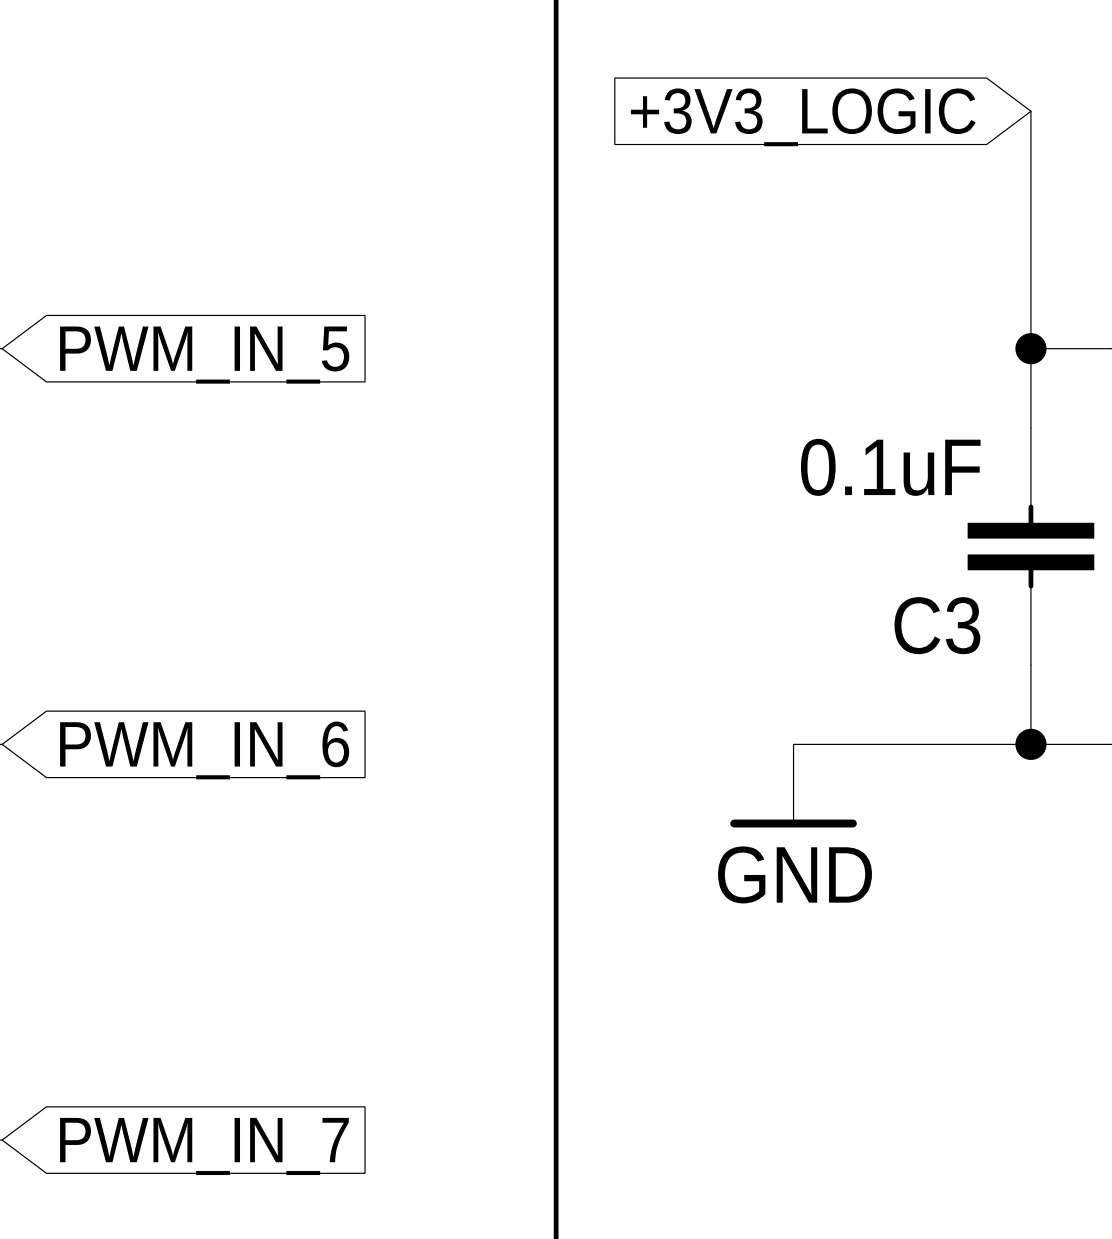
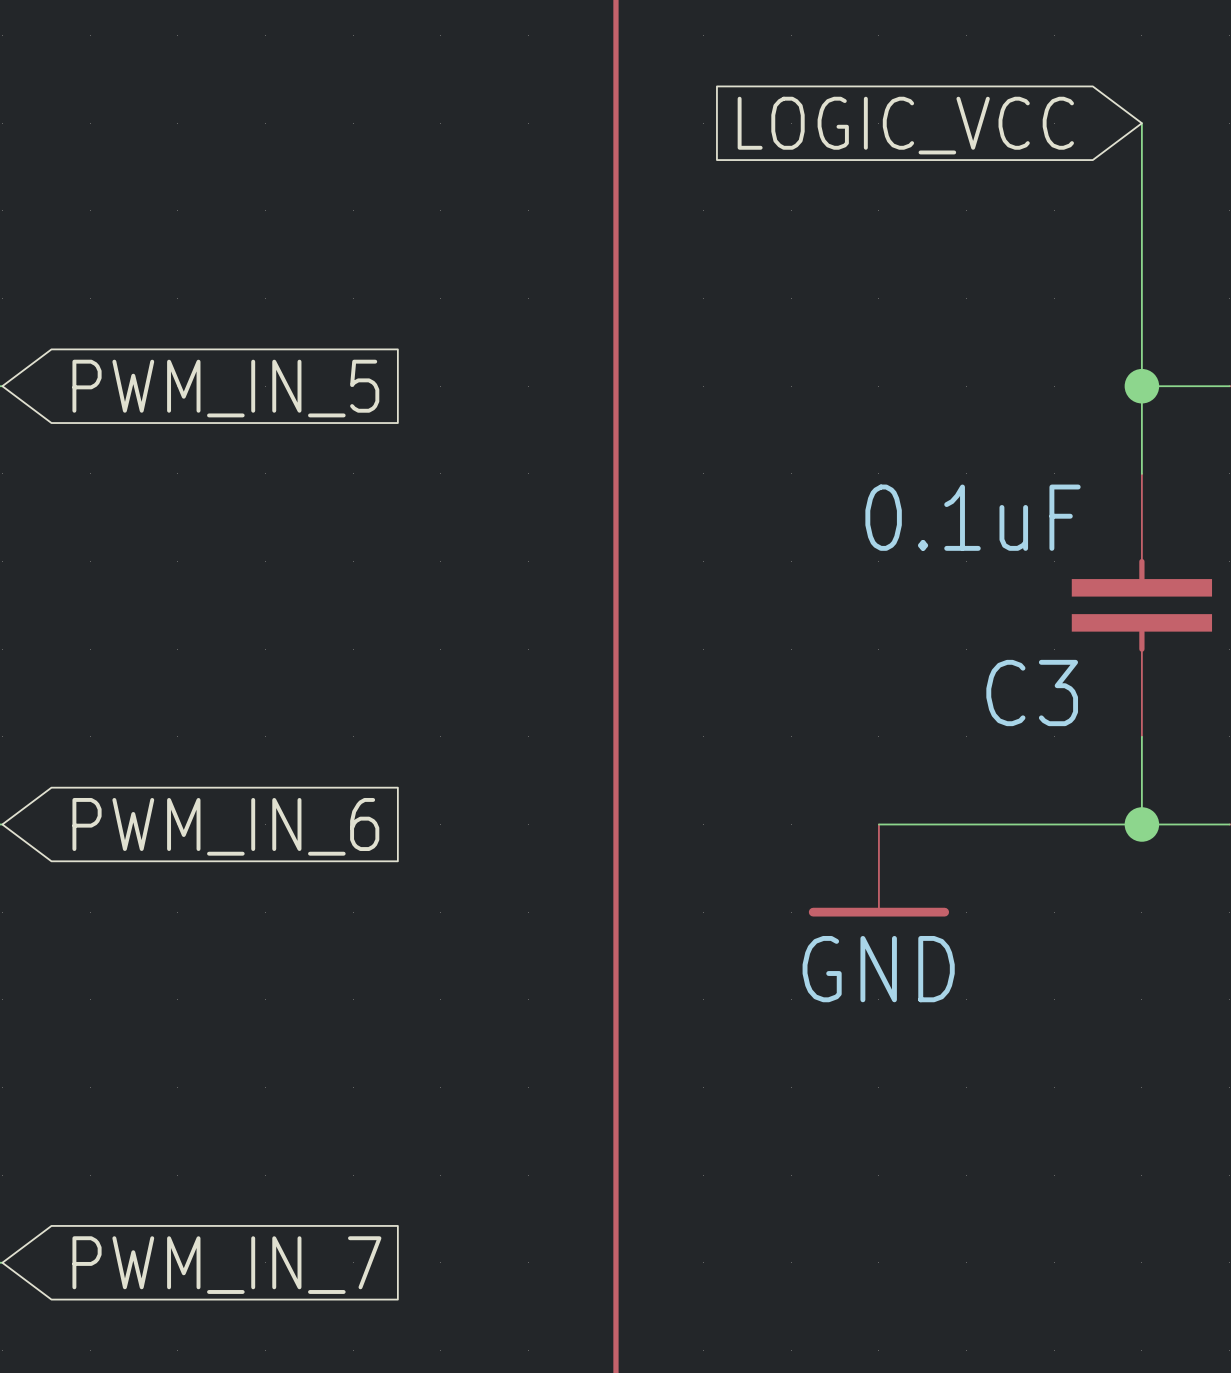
global label: +3V3_LOGIC (803, 117) -> LOGIC_VCC (905, 125)

